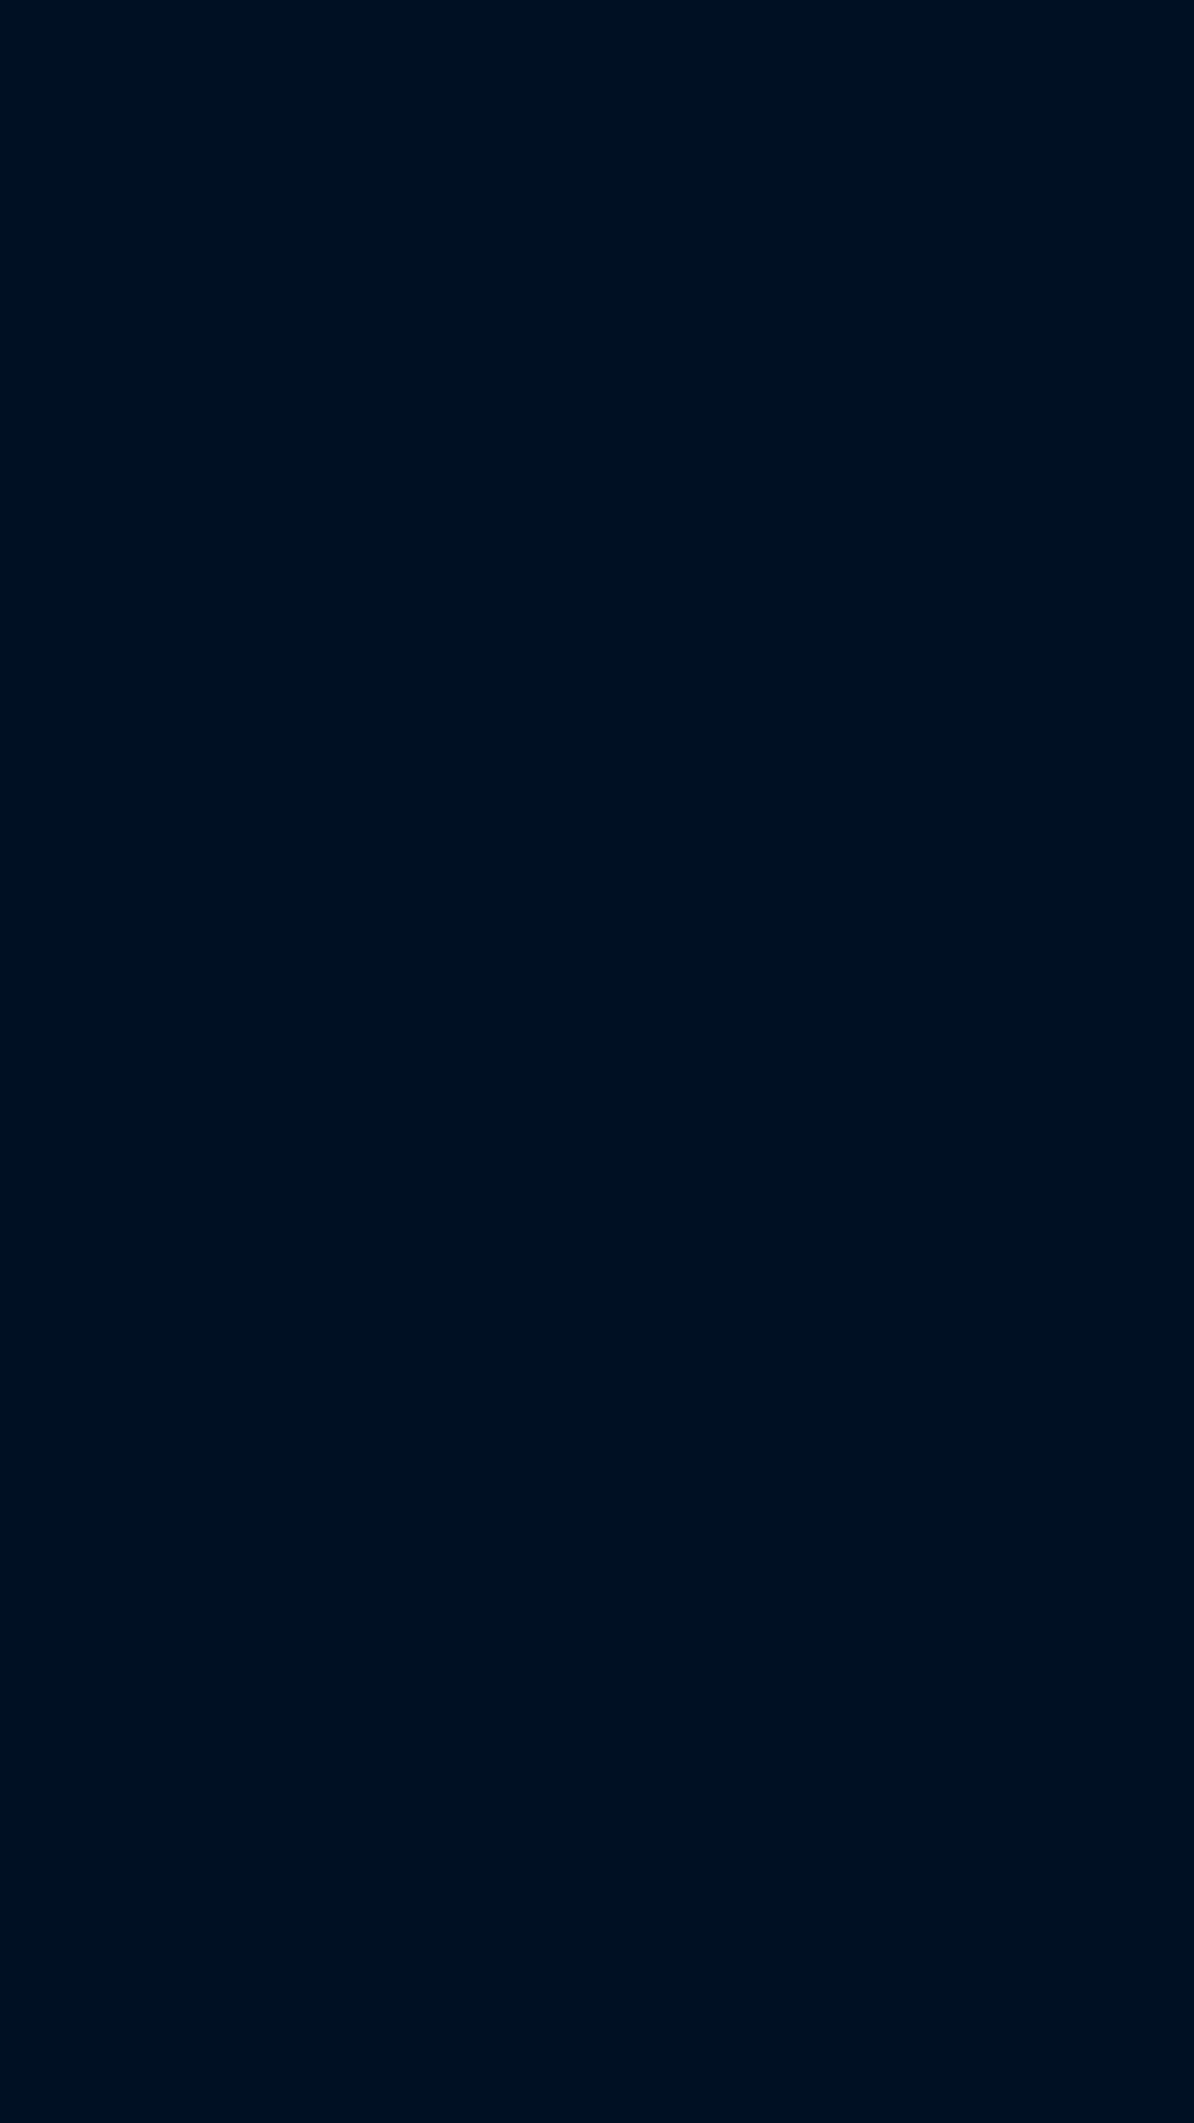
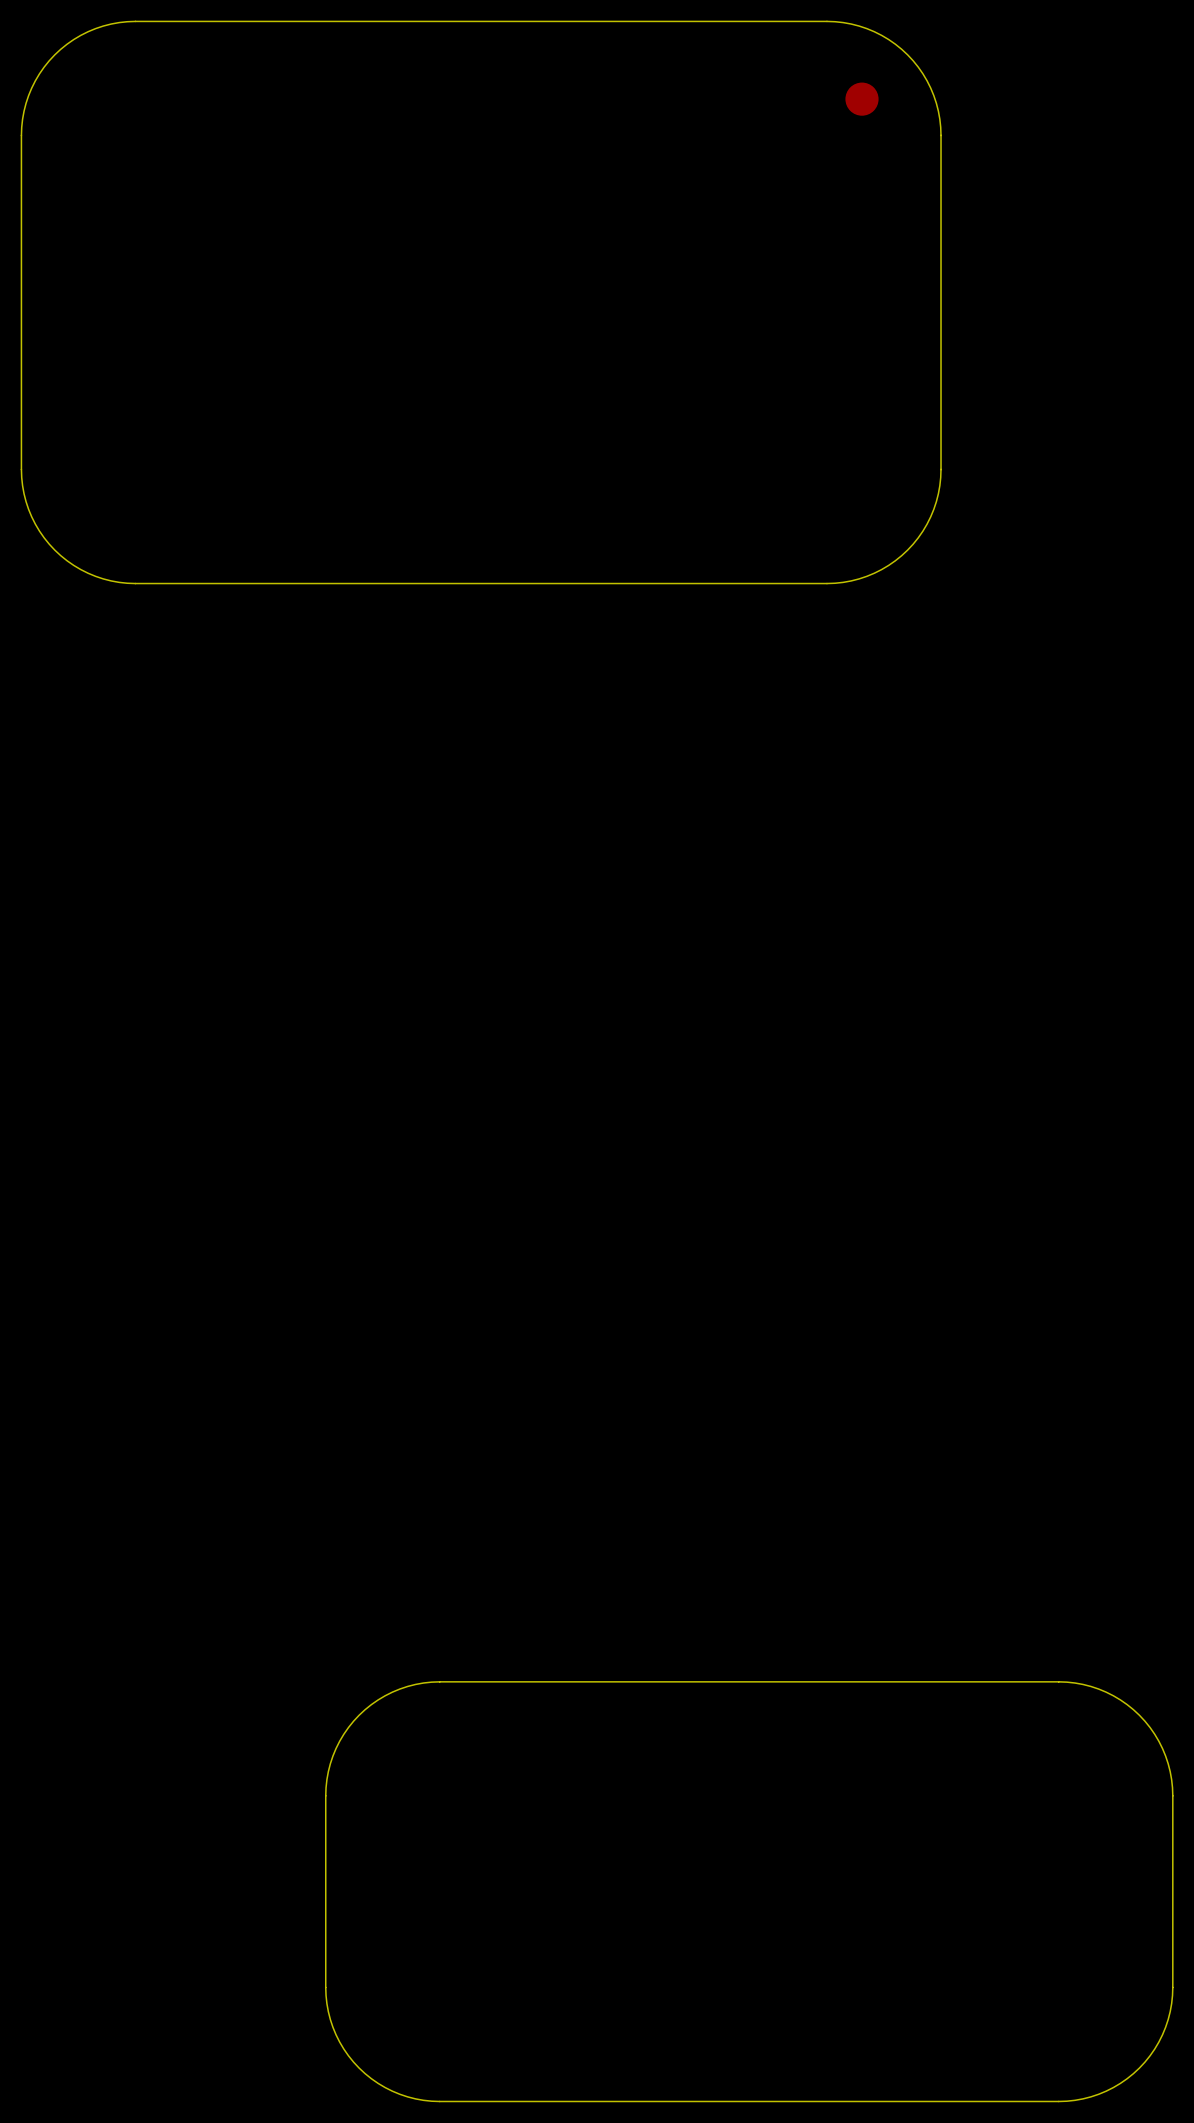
board edge: none -> (135, 21) (826, 21) (859, 26) (888, 39) (907, 54) (922, 73) (936, 103) (940, 127) (940, 477) (933, 509) (922, 531) (907, 550) (881, 569) (859, 578) (835, 583) (135, 583) (103, 578) (73, 565) (54, 550) (39, 531) (28, 509) (22, 485) (22, 119) (26, 103) (35, 80) (44, 67) (60, 49) (73, 39) (95, 28) (119, 22) (135, 21)
drawing: none -> [845, 82, 879, 116]
board edge: none -> (439, 1681) (1058, 1681) (1083, 1684) (1106, 1692) (1127, 1704) (1150, 1727) (1162, 1748) (1171, 1779) (1172, 1995) (1170, 2011) (1162, 2034) (1150, 2055) (1127, 2078) (1098, 2094) (1066, 2101) (439, 2101) (415, 2098) (392, 2091) (371, 2078) (353, 2062) (336, 2034) (328, 2011) (325, 1987) (326, 1779) (332, 1756) (339, 1741) (348, 1727) (365, 1709) (385, 1695) (399, 1689) (415, 1684) (439, 1681)

